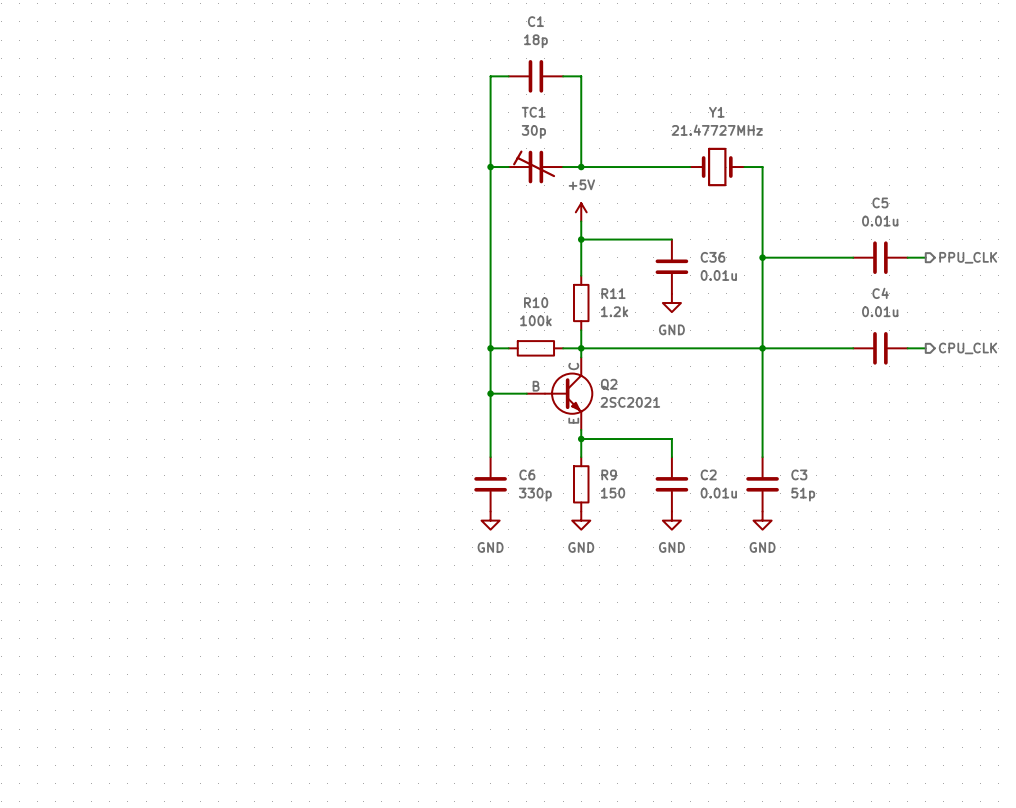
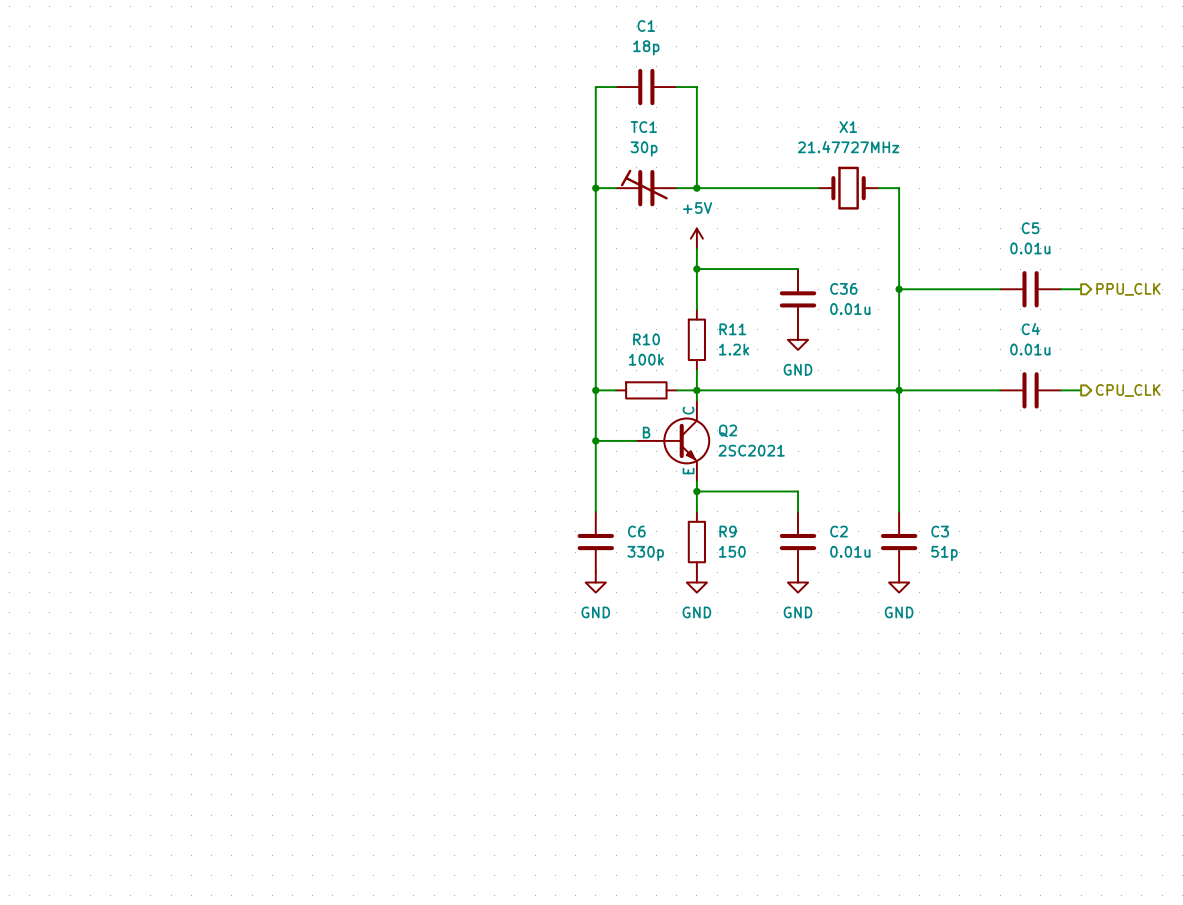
Y1 name: Y1 (716, 112) -> X1 (848, 127)

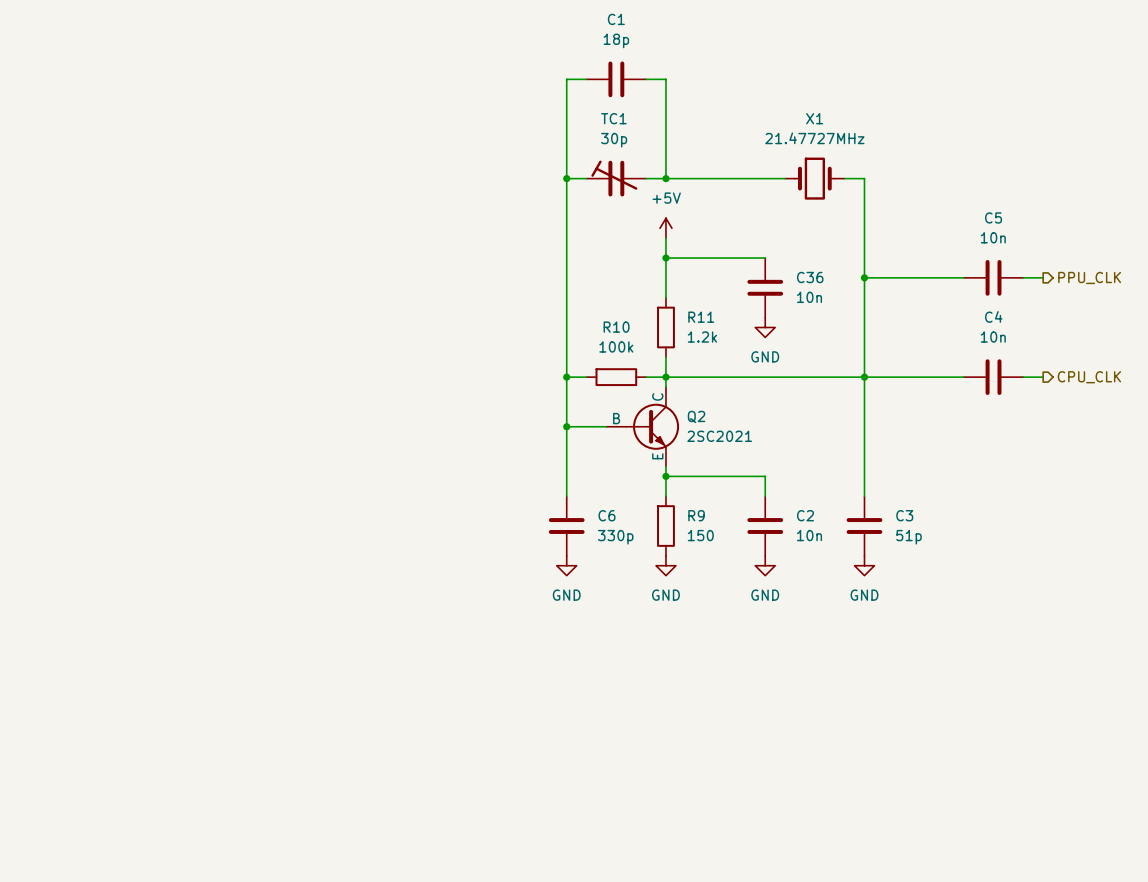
C5 value: 0.01u (1030, 248) -> 10n (993, 237)
C36 value: 0.01u (850, 309) -> 10n (809, 297)
C4 value: 0.01u (1030, 349) -> 10n (993, 337)
C2 value: 0.01u (850, 551) -> 10n (809, 535)

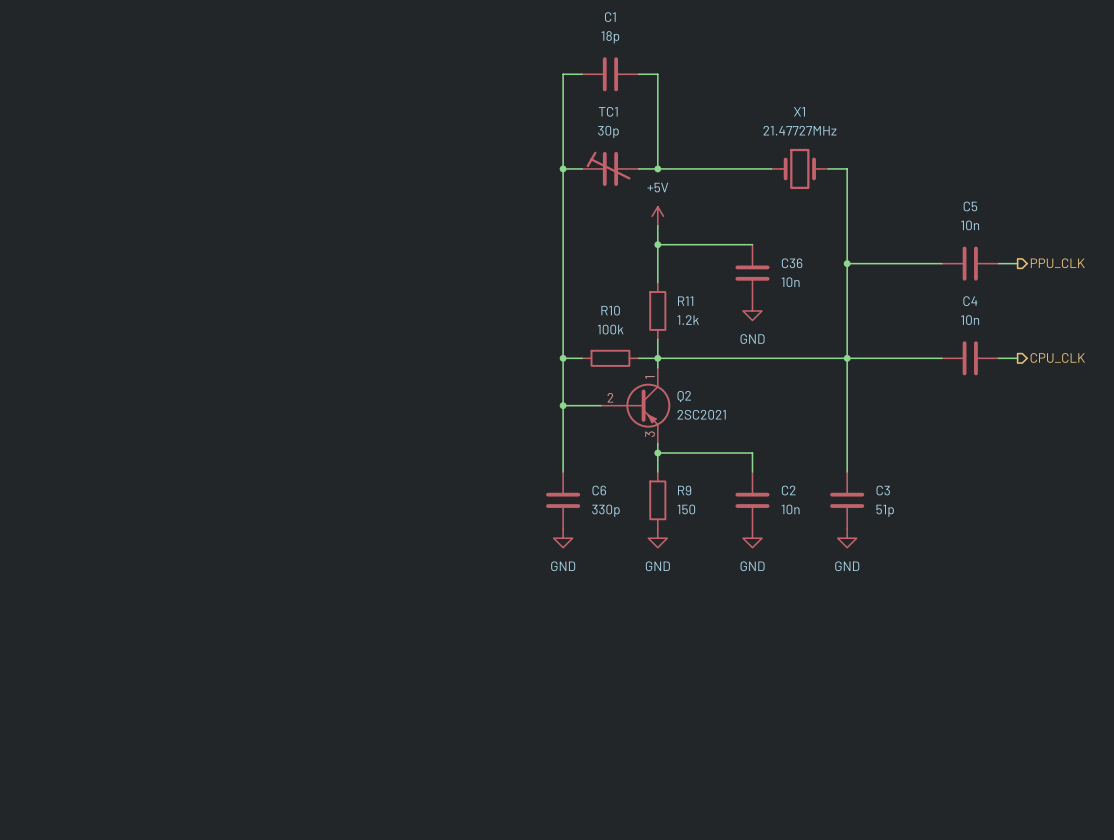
Q2 symbol: [606, 387, 680, 467] -> [600, 367, 671, 444]

